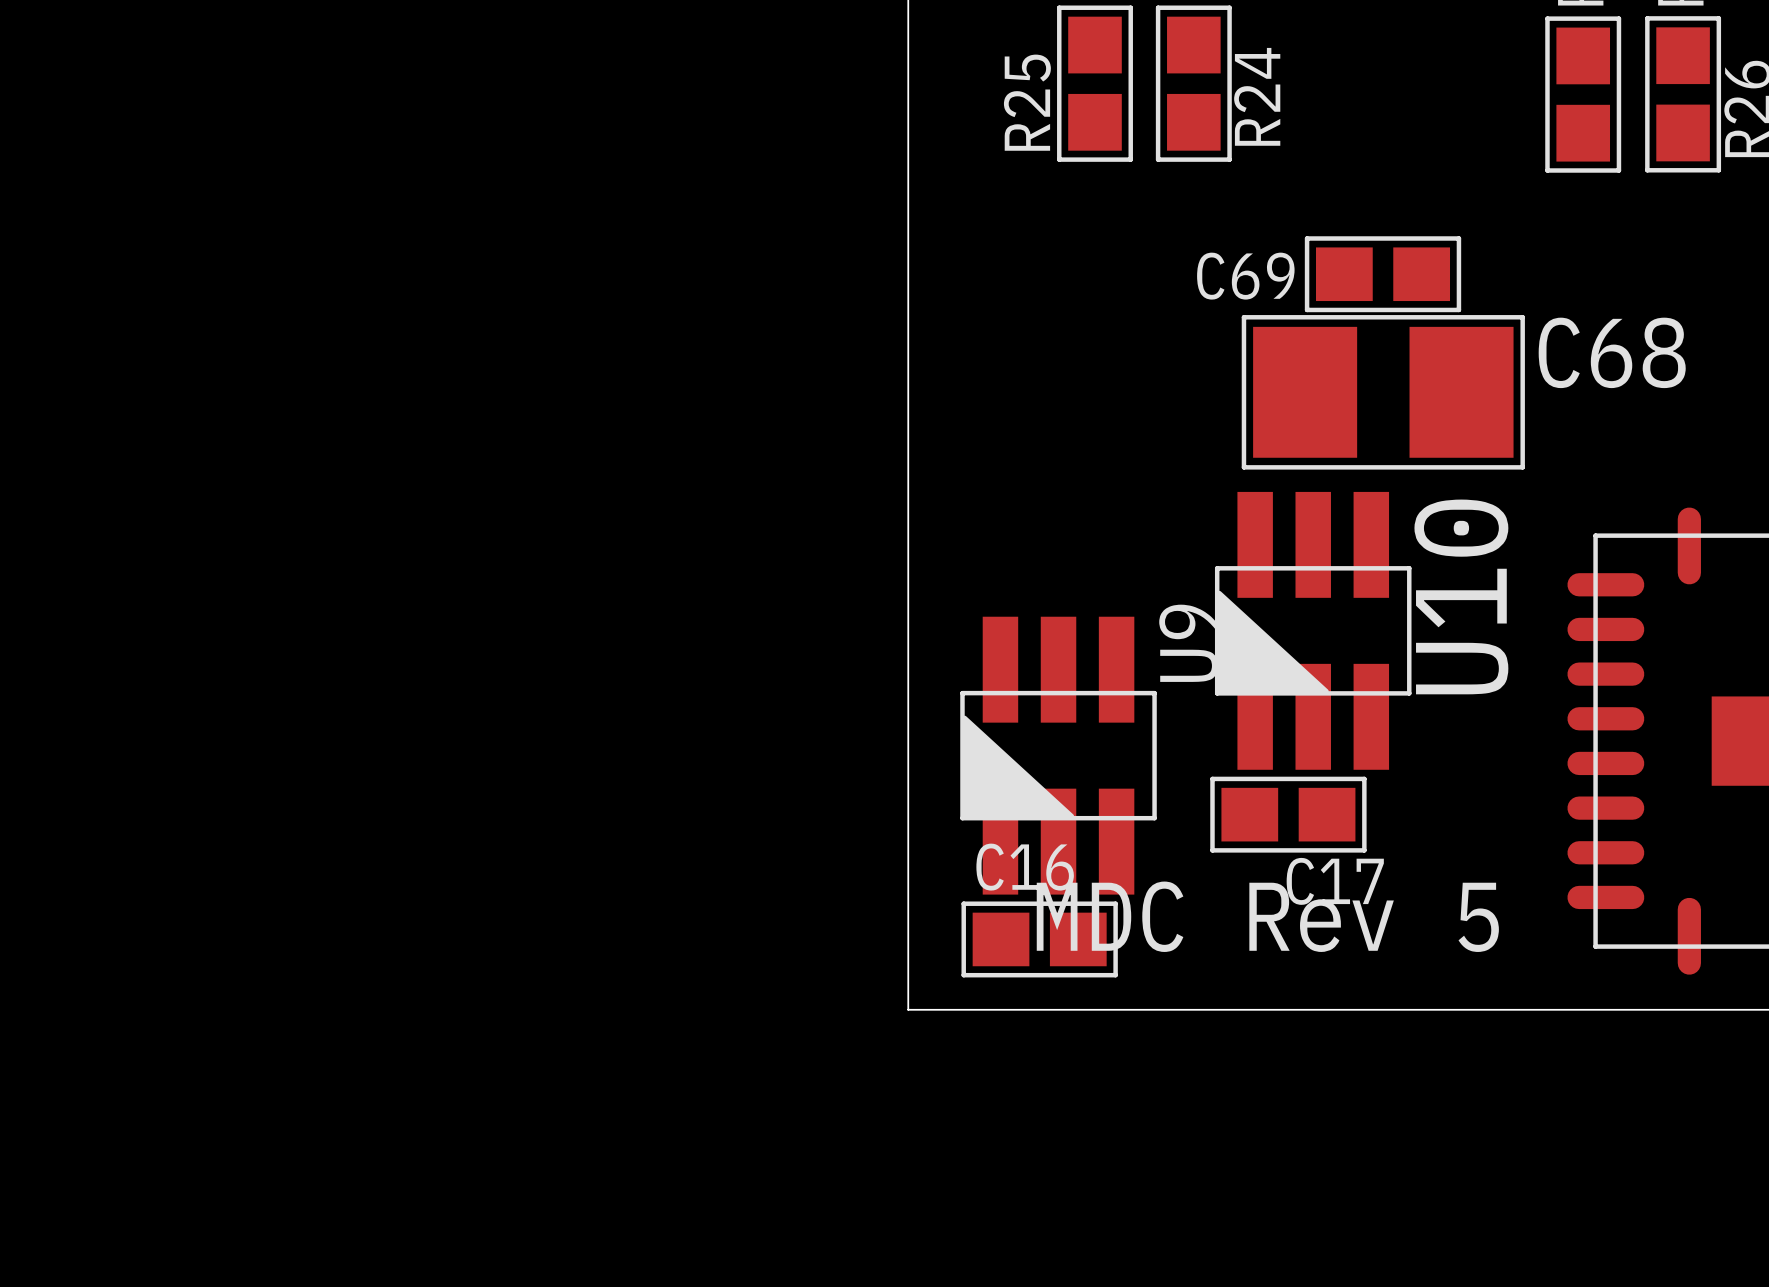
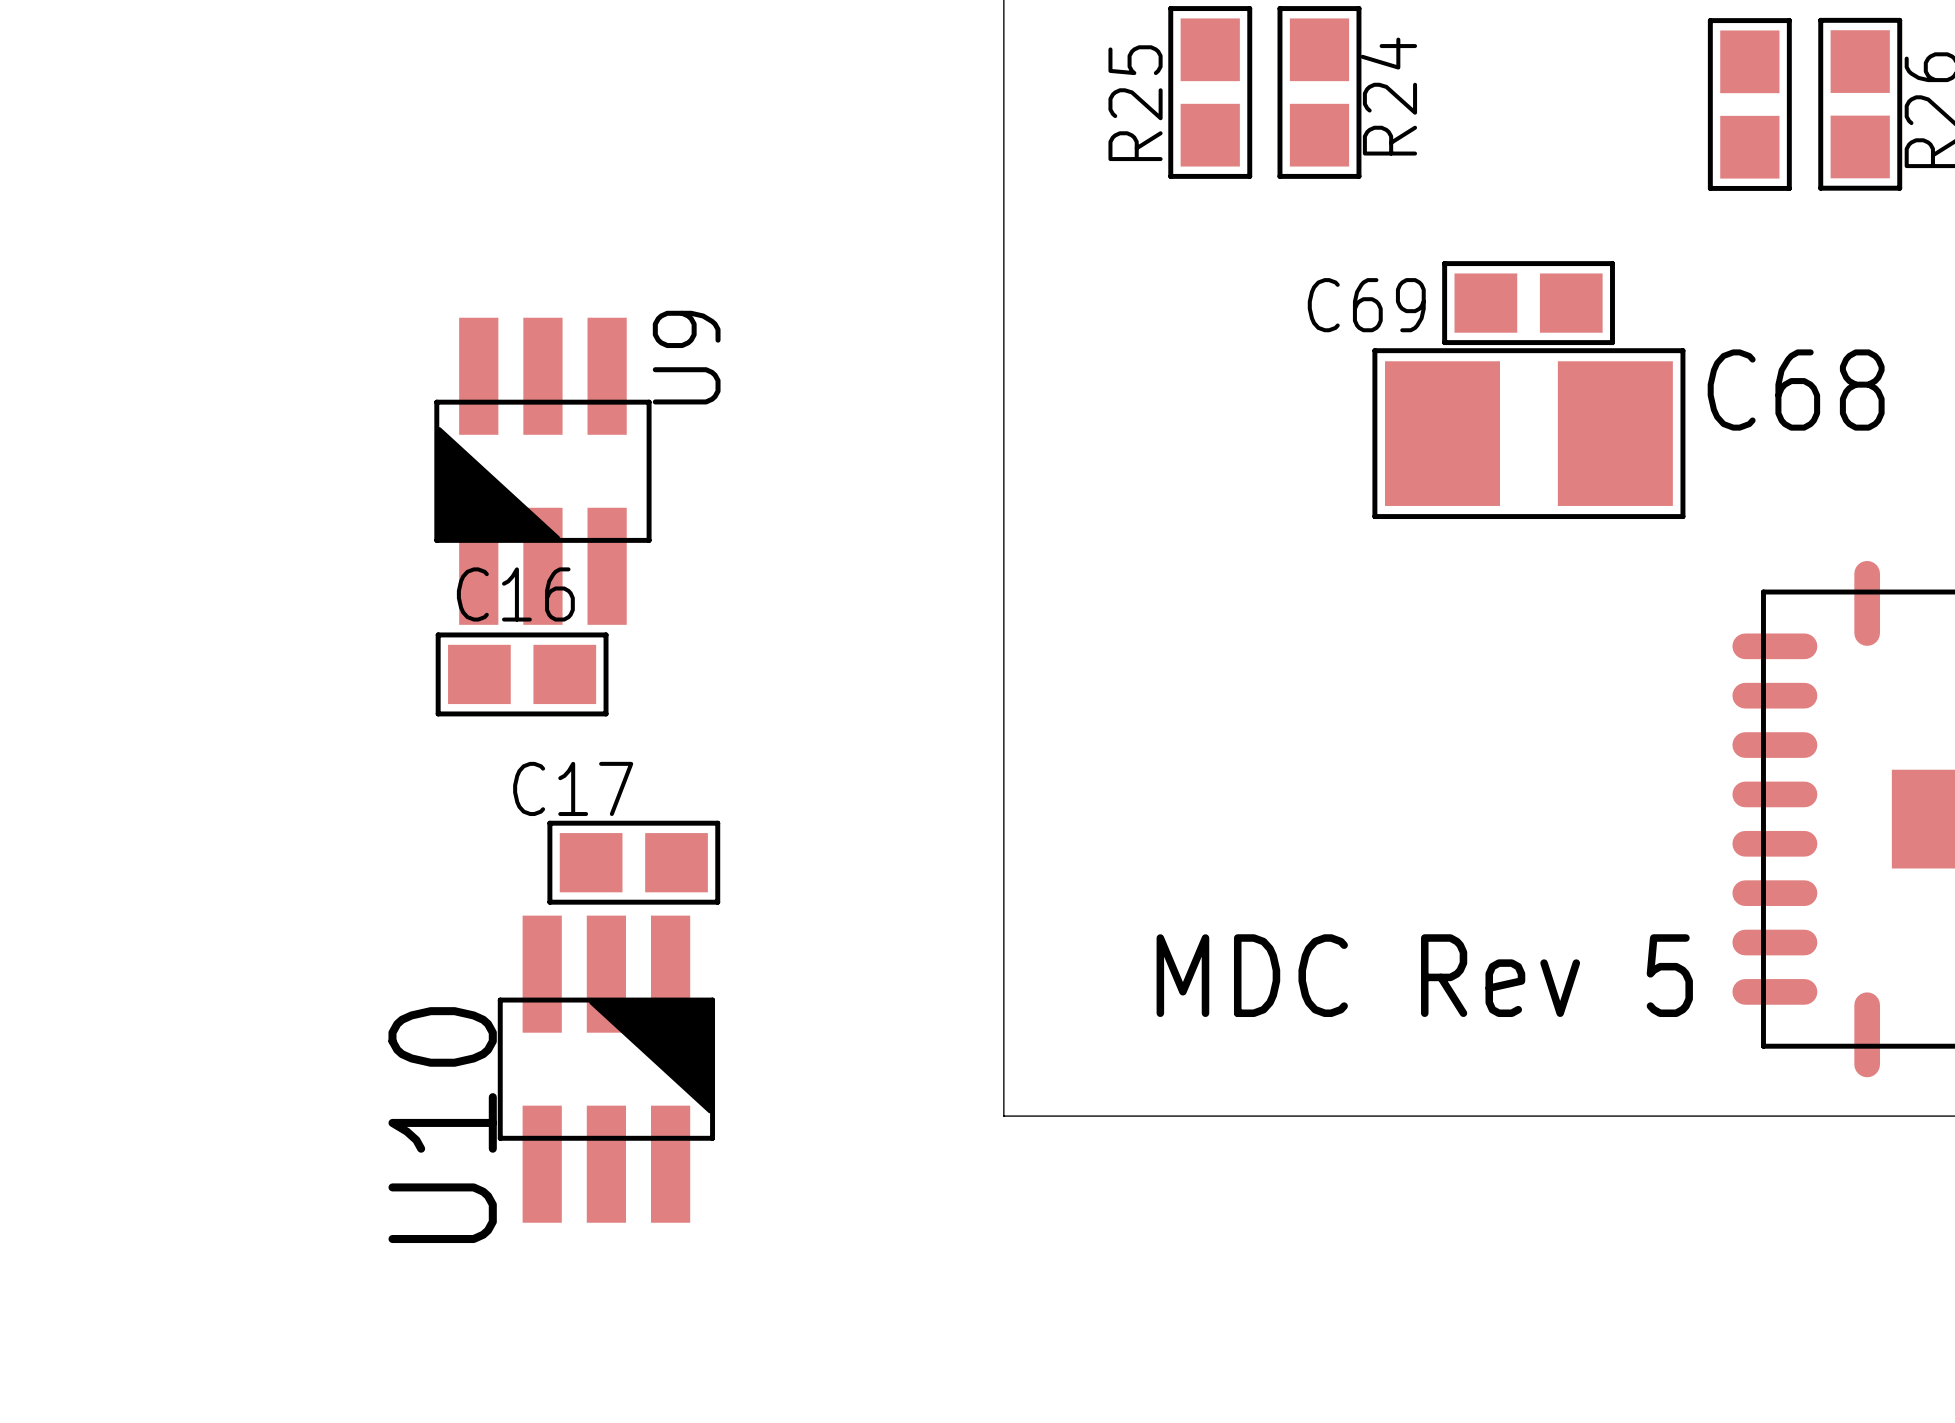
U10 rotation: 0° (1313, 630) -> 180° (606, 1069)
U10 position: (1313, 630) -> (606, 1069)
U9 position: (1058, 755) -> (542, 471)
C17 position: (1288, 814) -> (633, 862)
C17 name position: C17 (1335, 881) -> C17 (573, 788)
text position: MDC Rev 5 (1267, 916) -> MDC Rev 5 (1424, 975)
C16 position: (1039, 939) -> (522, 674)

